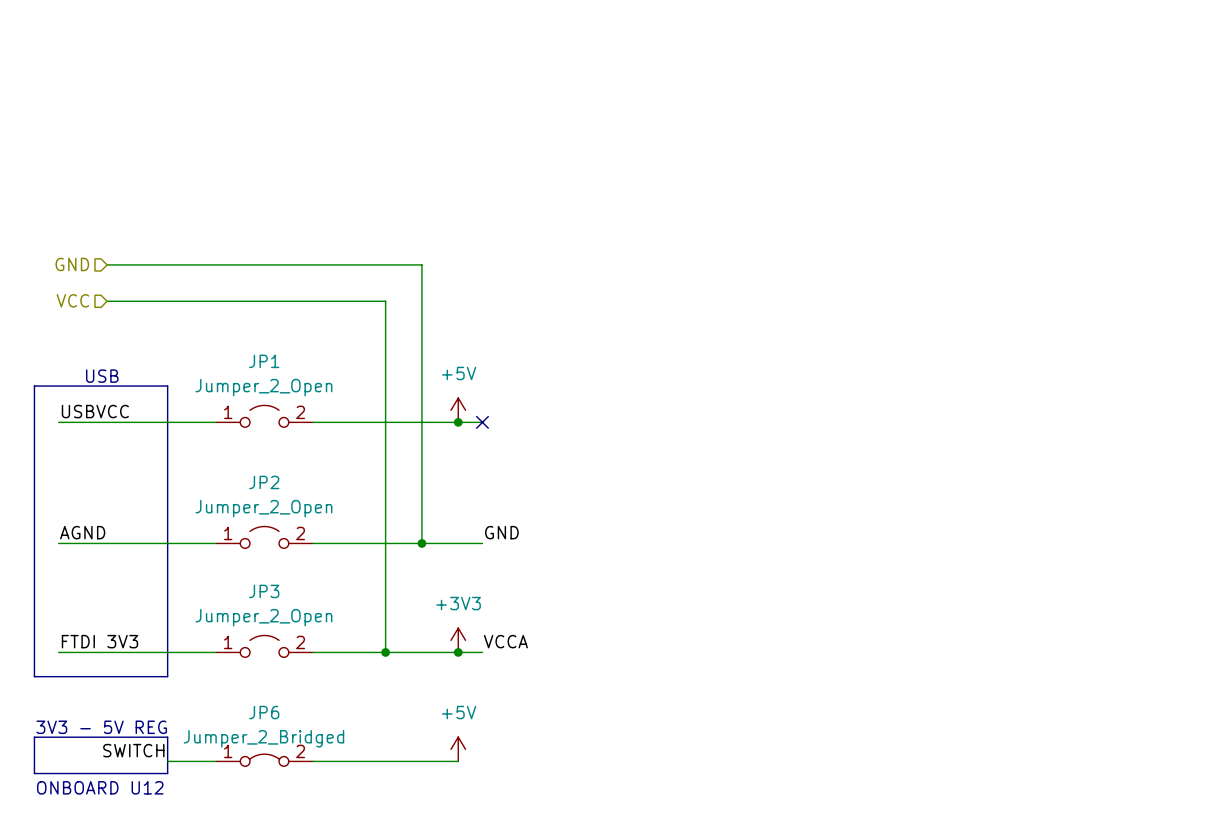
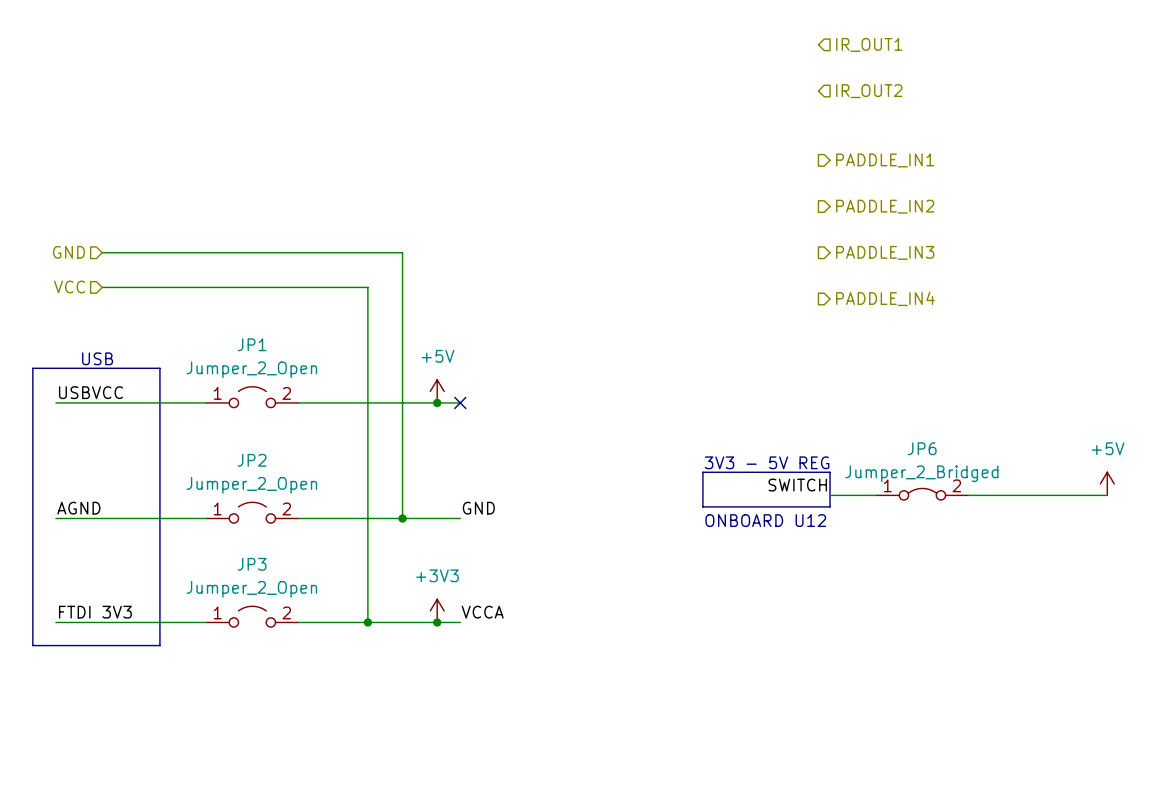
hierarchical label: none -> IR_OUT1 (869, 44)
hierarchical label: none -> IR_OUT2 (869, 91)
hierarchical label: none -> PADDLE_IN1 (885, 160)
hierarchical label: none -> PADDLE_IN2 (885, 206)
hierarchical label: none -> PADDLE_IN3 (885, 252)
hierarchical label: none -> PADDLE_IN4 (885, 298)
text: none -> 3V3 - 5V REG (767, 462)
line: none -> (702, 472) (830, 472) (830, 506) (702, 506) (702, 472)
power symbol: none -> +5V (1107, 483)
label: none -> SWITCH (797, 485)
wire: none -> (830, 495) (876, 495)
wire: none -> (968, 495) (1107, 495)
text: none -> ONBOARD U12 (765, 520)
text: 3V3 - 5V REG (101, 727) -> none
line: (34, 737) (34, 773) (167, 773) (167, 737) (34, 737) -> none
power symbol: +5V (458, 749) -> none
label: SWITCH (133, 750) -> none
JP6 position: (264, 760) -> (922, 494)
wire: (167, 761) (216, 761) -> none
wire: (312, 761) (458, 761) -> none
text: ONBOARD U12 (100, 787) -> none

